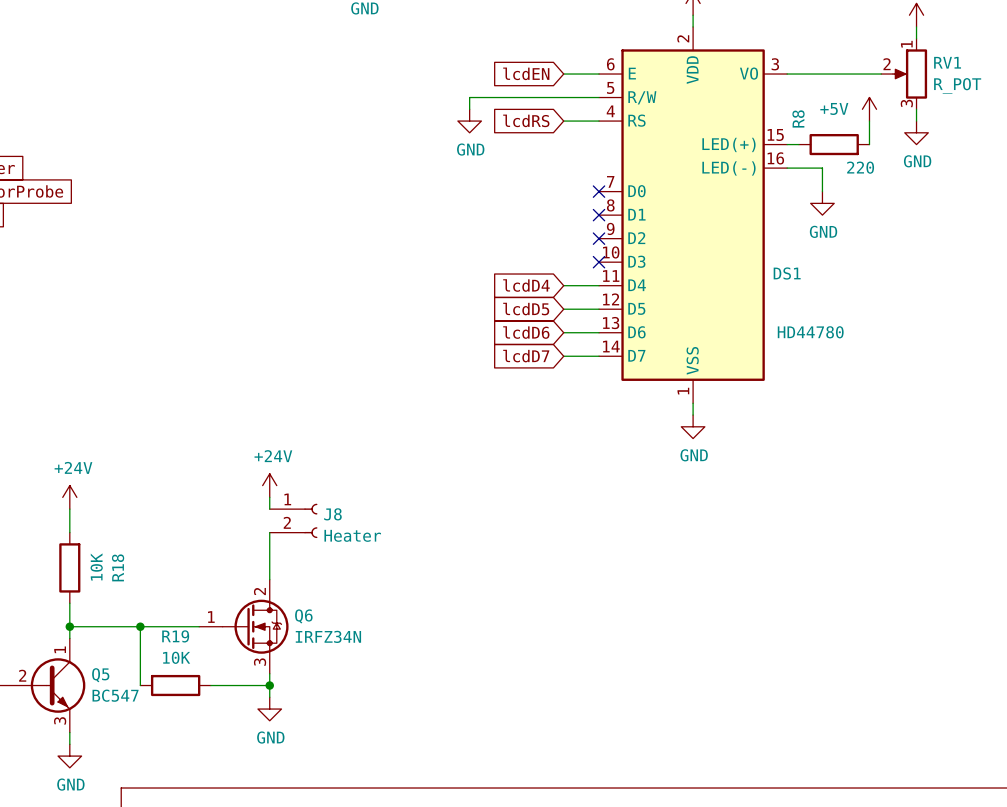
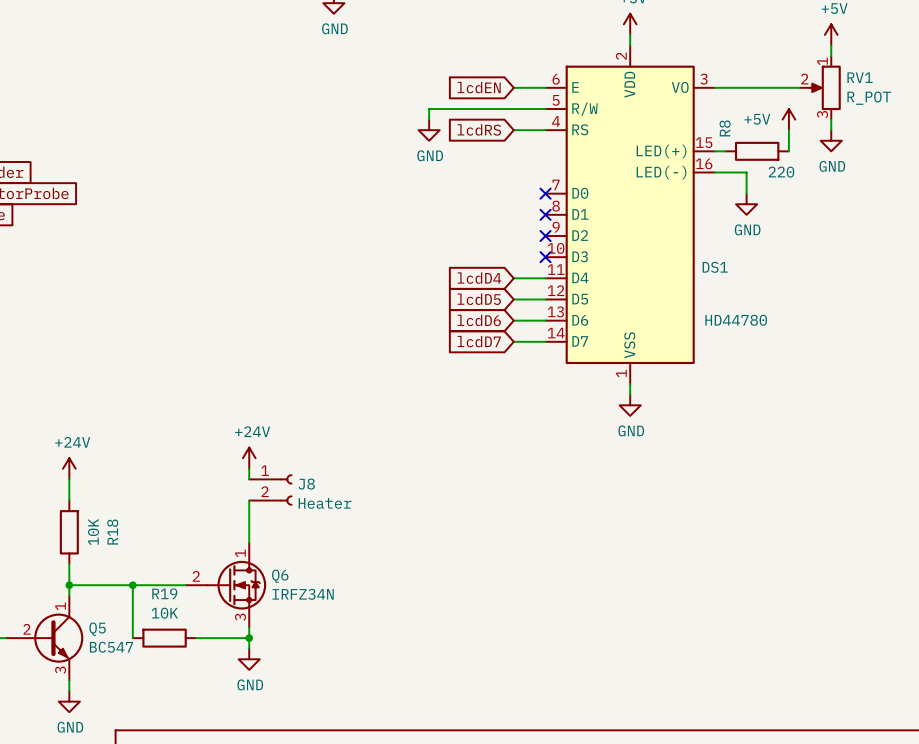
Q6 pin number: 2 (259, 591) -> 1 (240, 553)
Q6 pin number: 1 (211, 617) -> 2 (196, 576)

